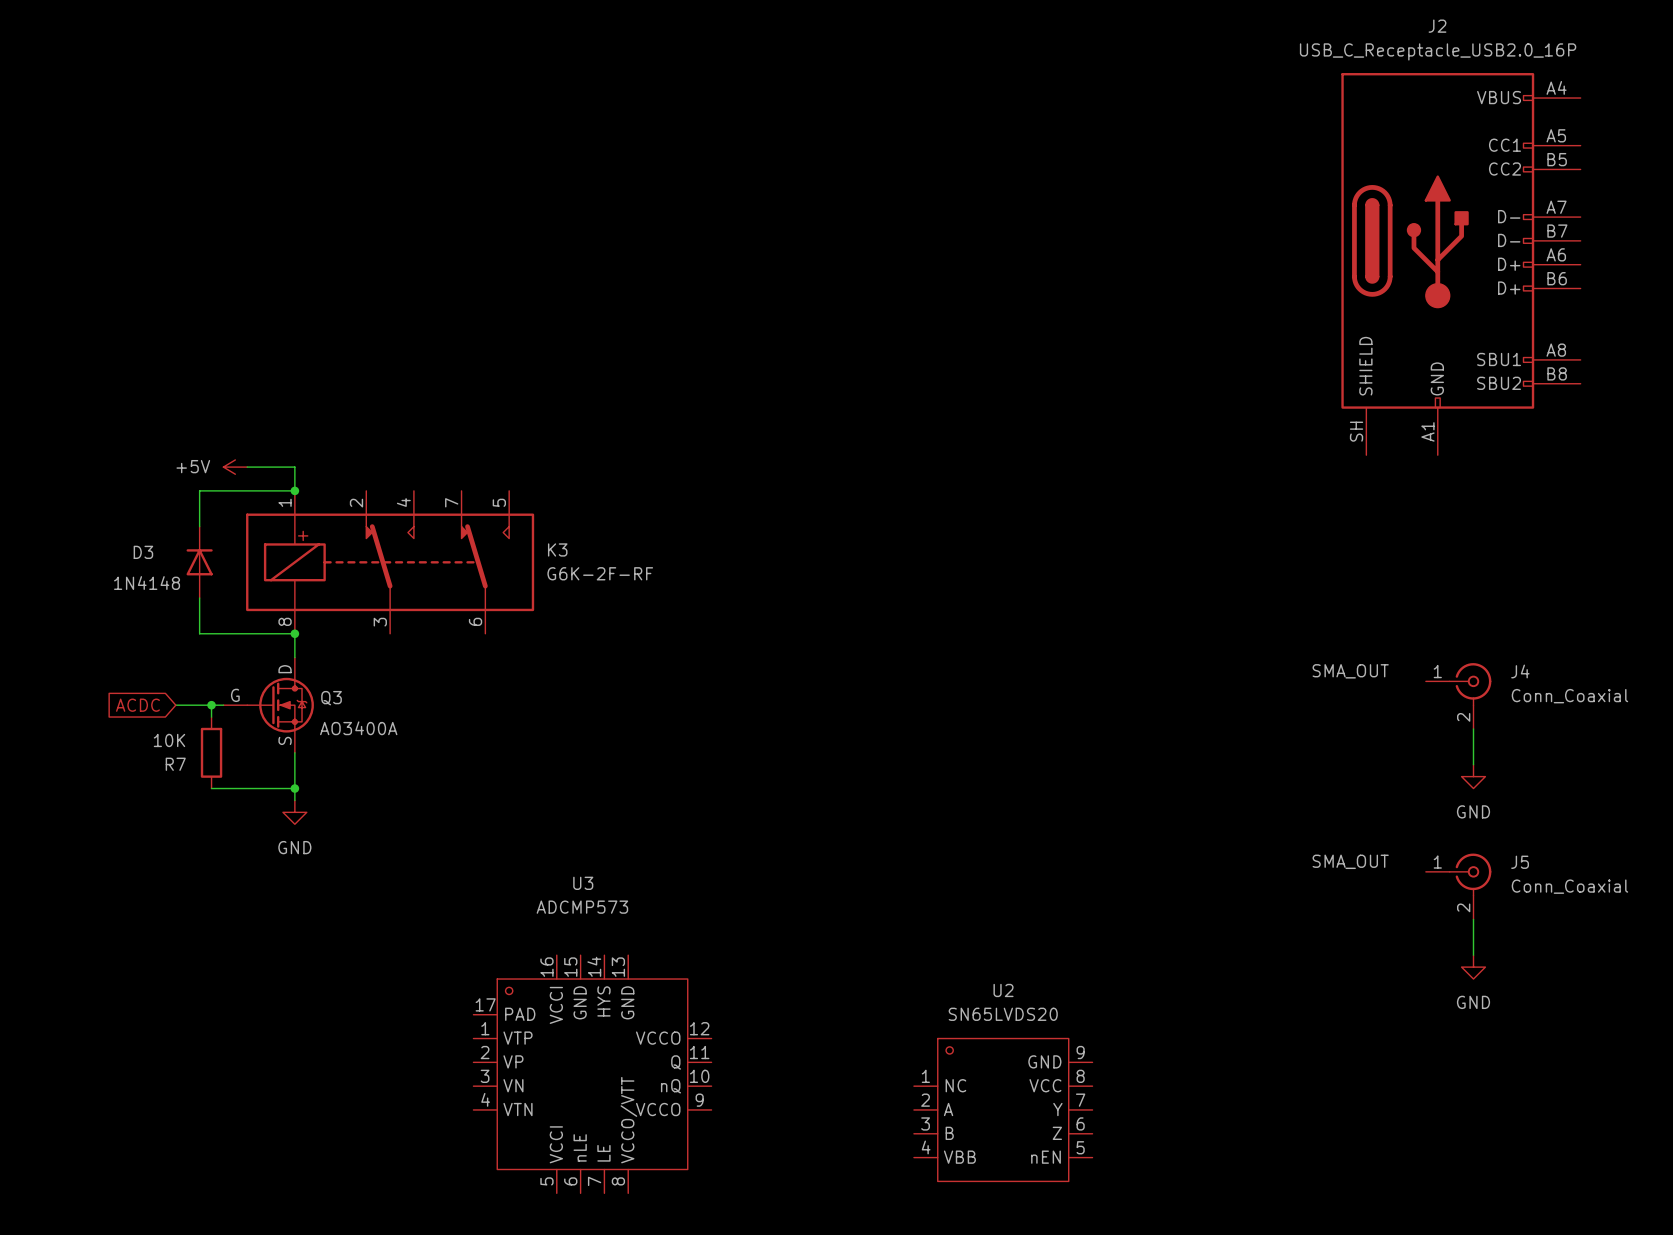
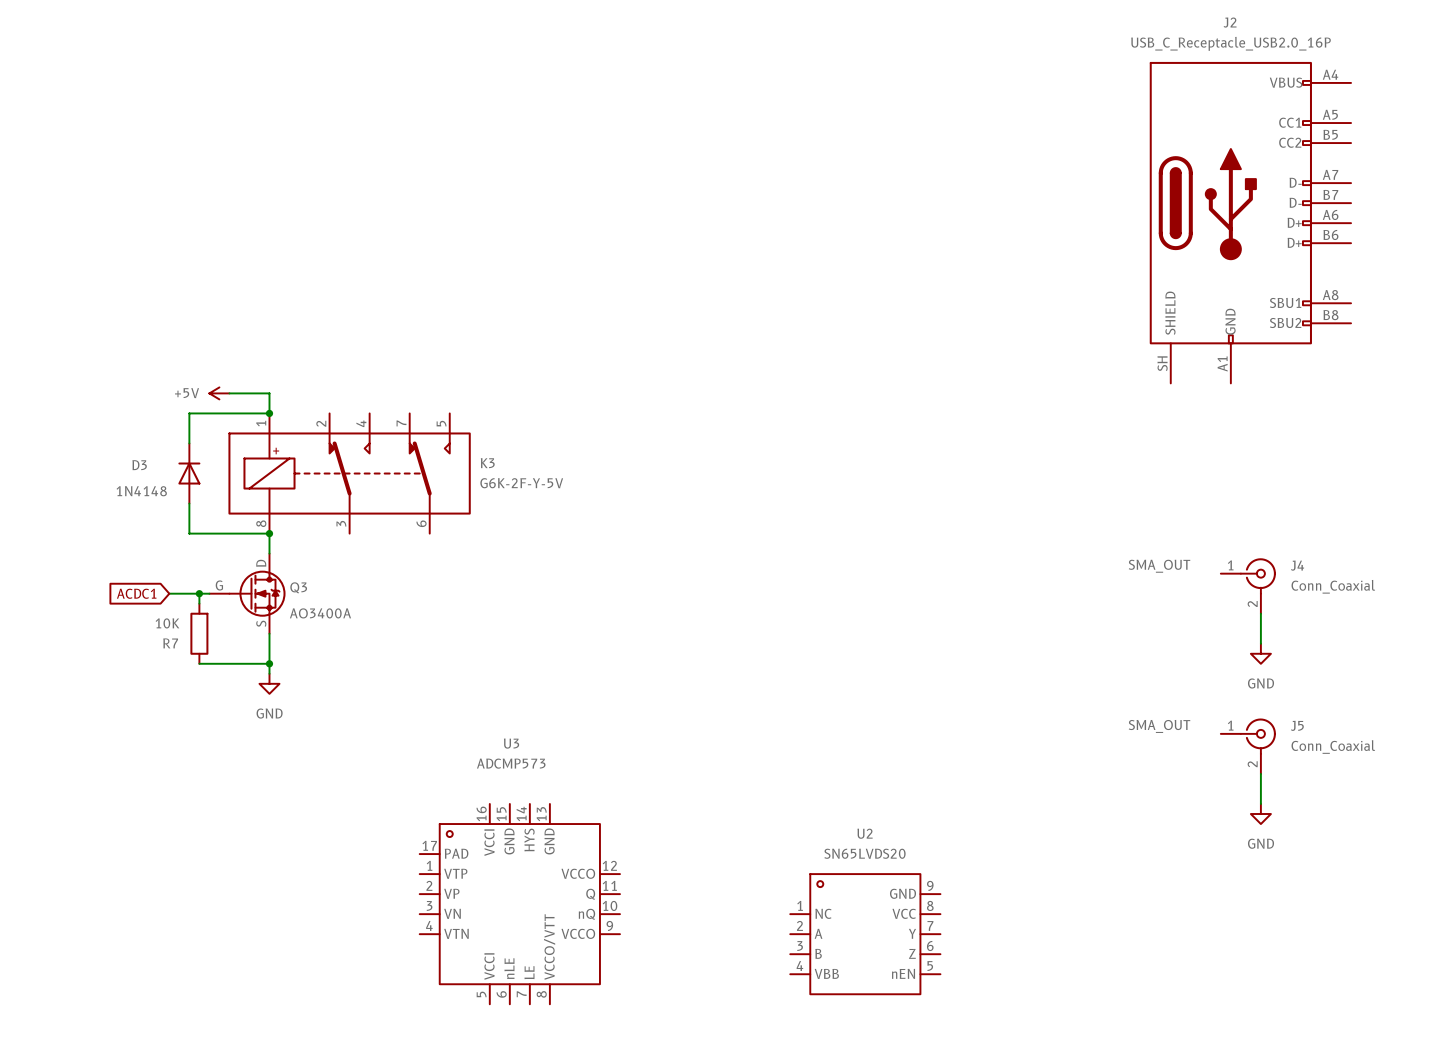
K3 value: G6K-2F-RF (600, 573) -> G6K-2F-Y-5V (521, 483)
global label: ACDC (137, 705) -> ACDC1 (136, 593)

